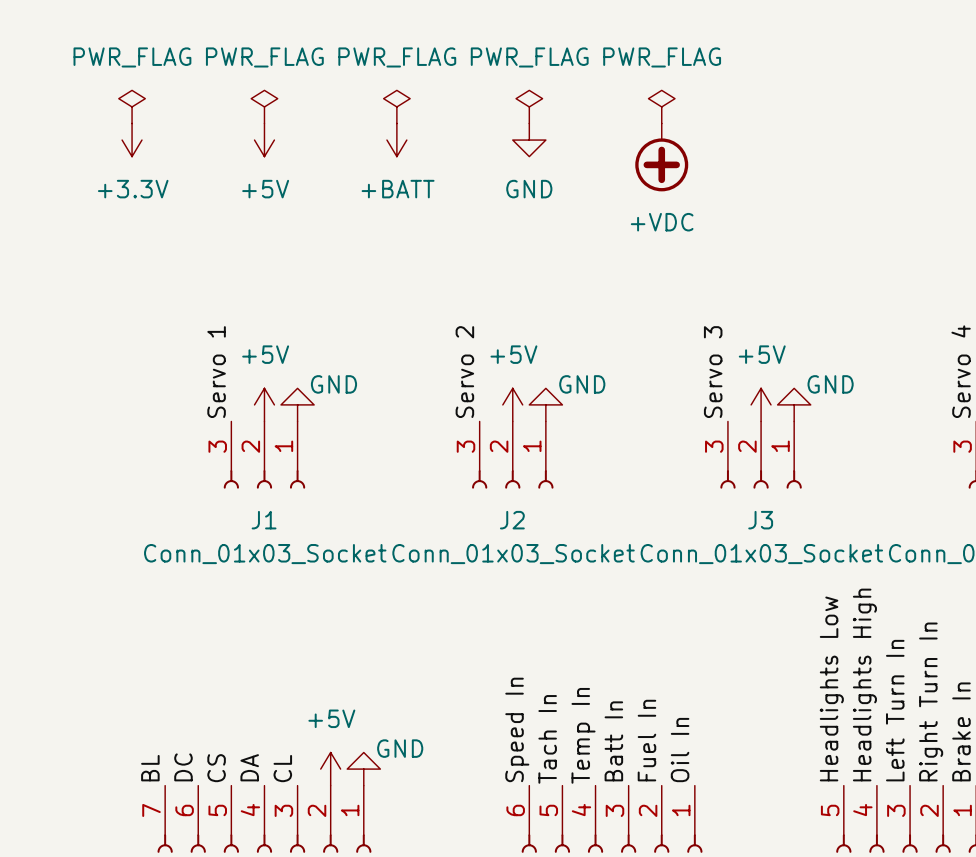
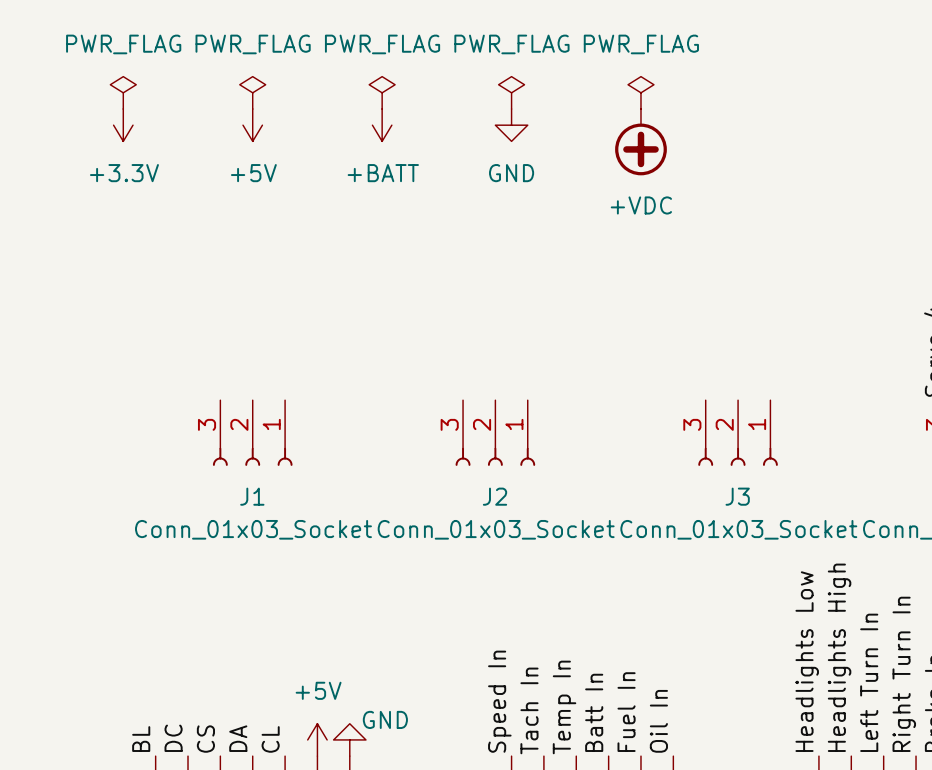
label: Servo 1 (216, 372) -> none
label: Servo 2 (464, 372) -> none
label: Servo 3 (713, 372) -> none
power symbol: +5V (264, 404) -> none
power symbol: GND (297, 404) -> none
power symbol: +5V (512, 404) -> none
power symbol: GND (545, 404) -> none
power symbol: +5V (761, 404) -> none
power symbol: GND (794, 404) -> none

